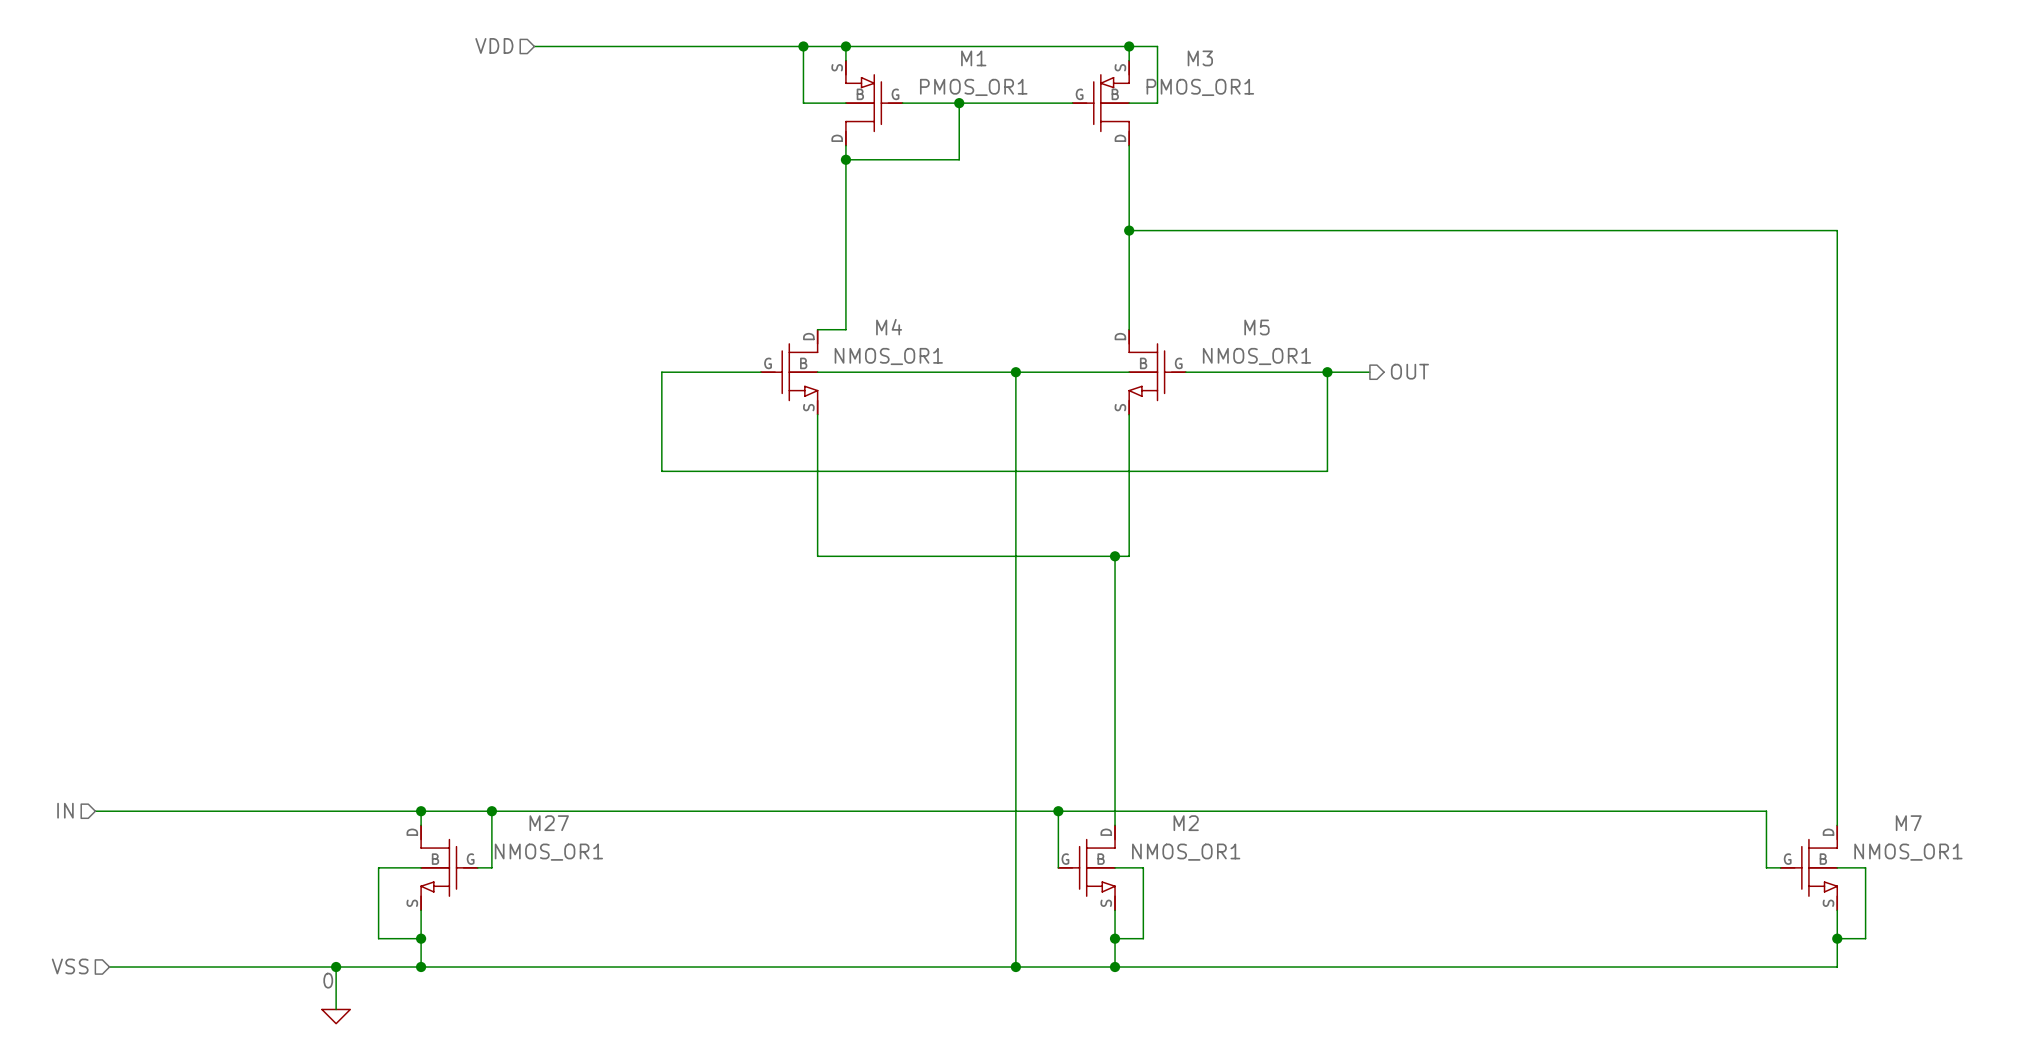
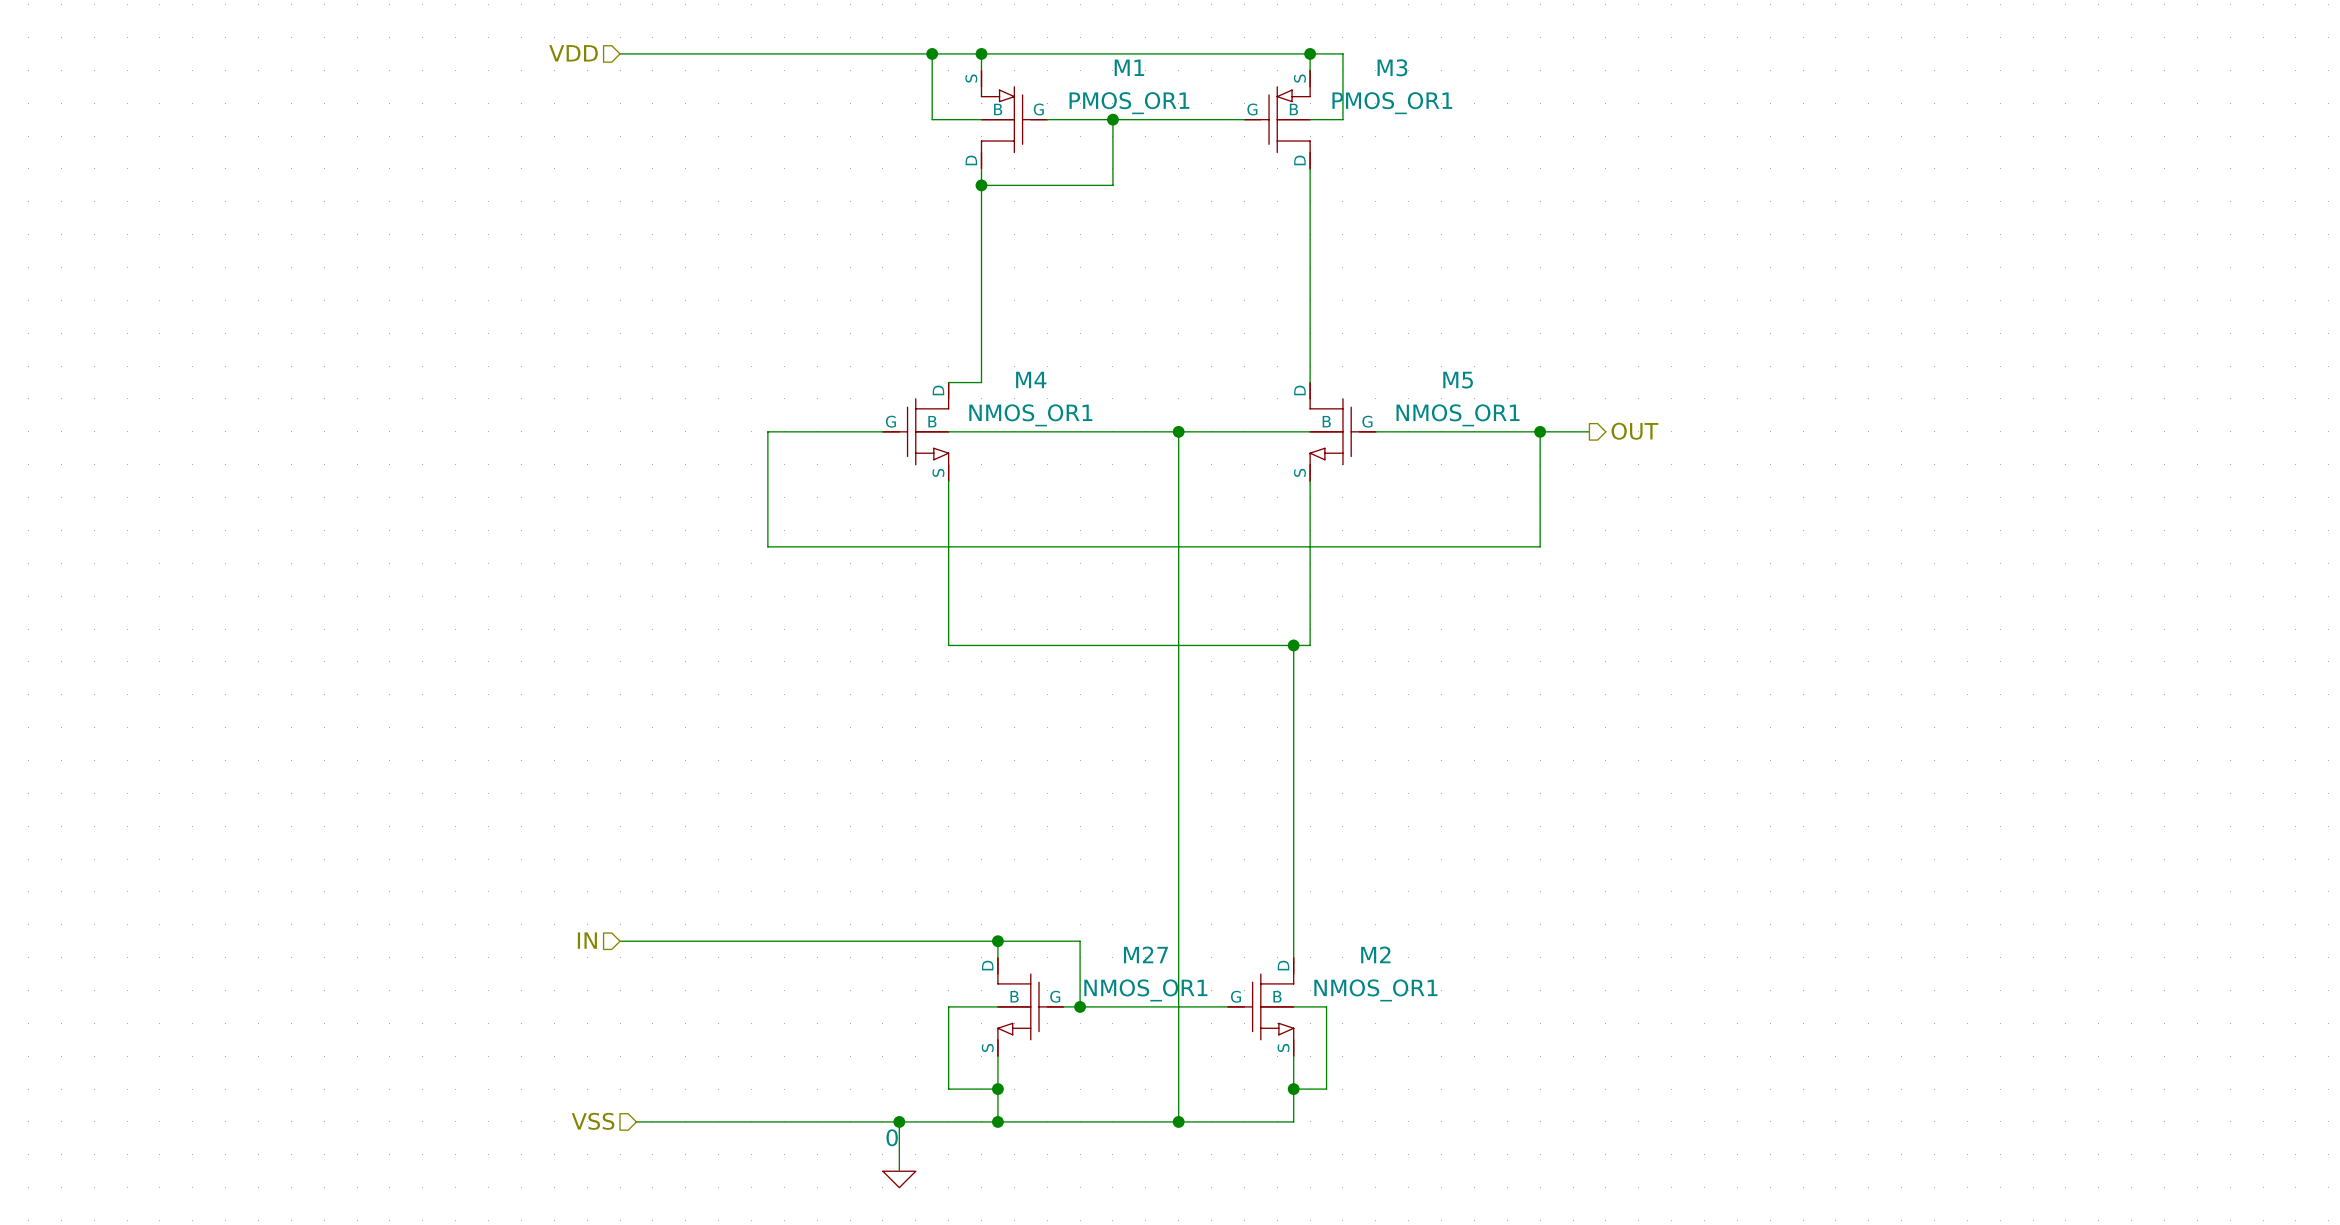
wire: (1129, 230) (1837, 230) (1837, 825) -> none
junction: (1129, 230) -> none
hierarchical label: IN (65, 810) -> none
hierarchical label: none -> IN (587, 940)
wire: (95, 811) (534, 811) -> none
wire: (421, 811) (421, 825) -> none
junction: (421, 811) -> none
wire: (491, 811) (491, 867) (477, 867) -> none
junction: (491, 811) -> none
wire: none -> (997, 941) (997, 957)
junction: none -> (997, 941)
wire: (930, 811) (1766, 811) (1766, 867) (1780, 867) -> (1080, 941) (1080, 1006)
wire: (1058, 811) (1058, 867) -> (1063, 1006) (1227, 1006)
junction: (1058, 811) -> none
wire: (421, 867) (378, 867) (378, 938) (421, 938) -> none
M27 position: (449, 867) -> (1030, 1006)
wire: none -> (997, 1006) (948, 1006) (948, 1089) (997, 1089)
junction: none -> (1080, 1006)
M7: NMOS_OR1 (1808, 867) -> none
wire: (1837, 867) (1865, 867) (1865, 938) (1837, 938) -> none
wire: (421, 910) (421, 967) -> none
wire: none -> (997, 1056) (997, 1121)
wire: (1837, 910) (1837, 967) (1115, 967) -> none
junction: (421, 938) -> none
junction: none -> (997, 1089)
junction: (1837, 938) -> none
hierarchical label: VSS (70, 966) -> none
hierarchical label: none -> VSS (593, 1121)
wire: (109, 967) (548, 967) -> none
wire: (336, 967) (336, 1009) -> none
junction: (336, 967) -> none
junction: (421, 967) -> none
wire: none -> (899, 1121) (899, 1171)
junction: none -> (899, 1121)
junction: none -> (997, 1121)
junction: (1115, 967) -> none
power symbol: 0 (336, 1016) -> none
power symbol: none -> 0 (899, 1179)

